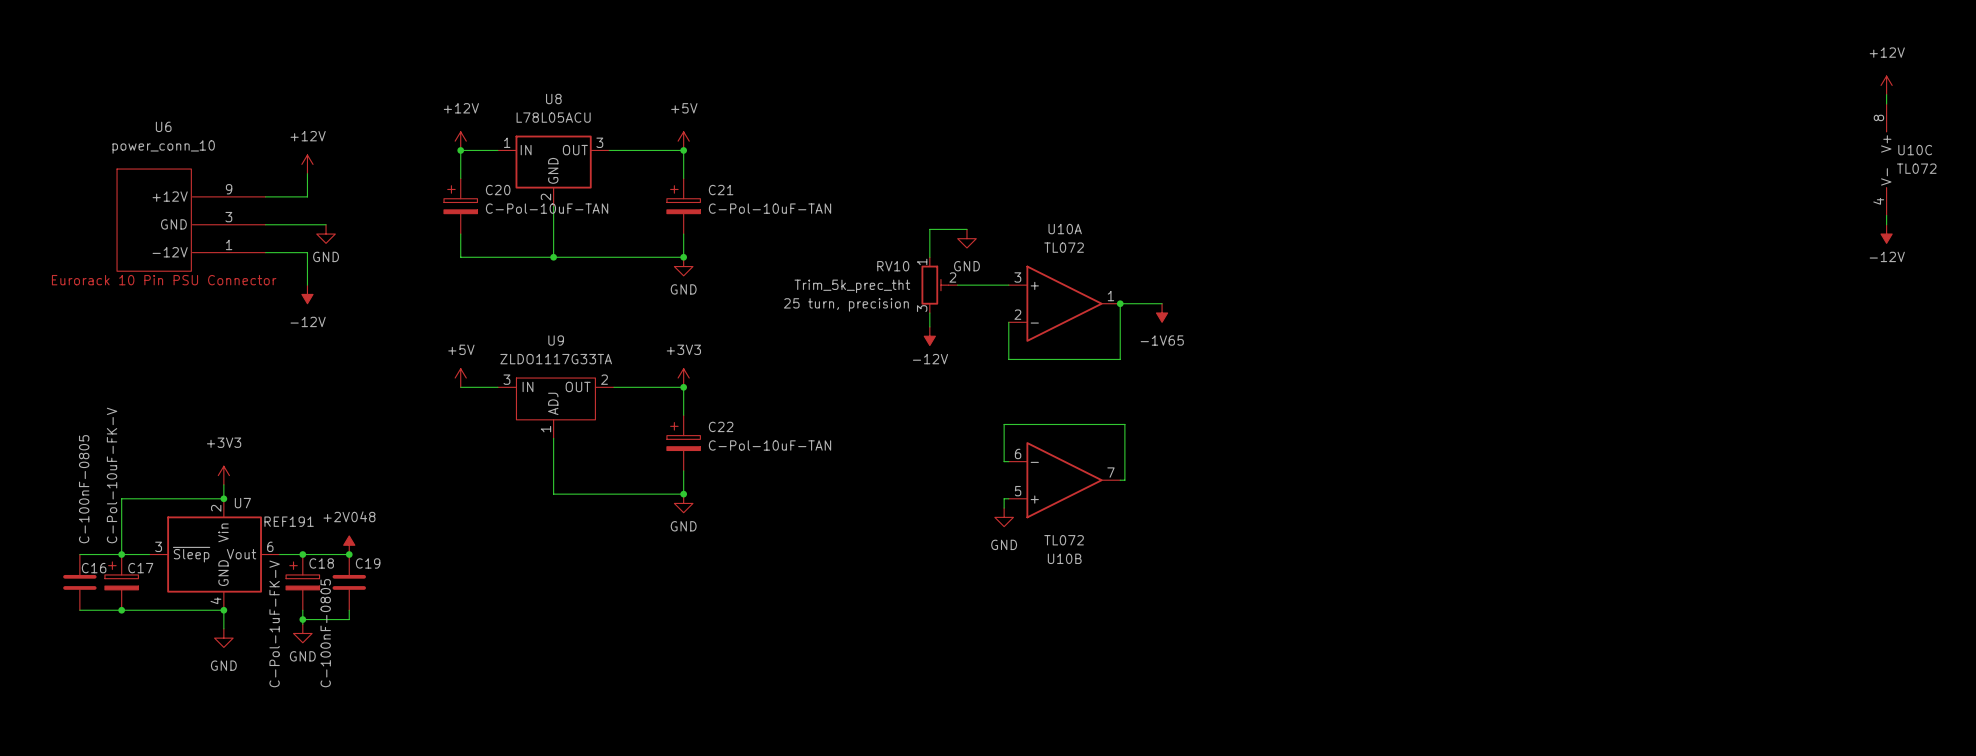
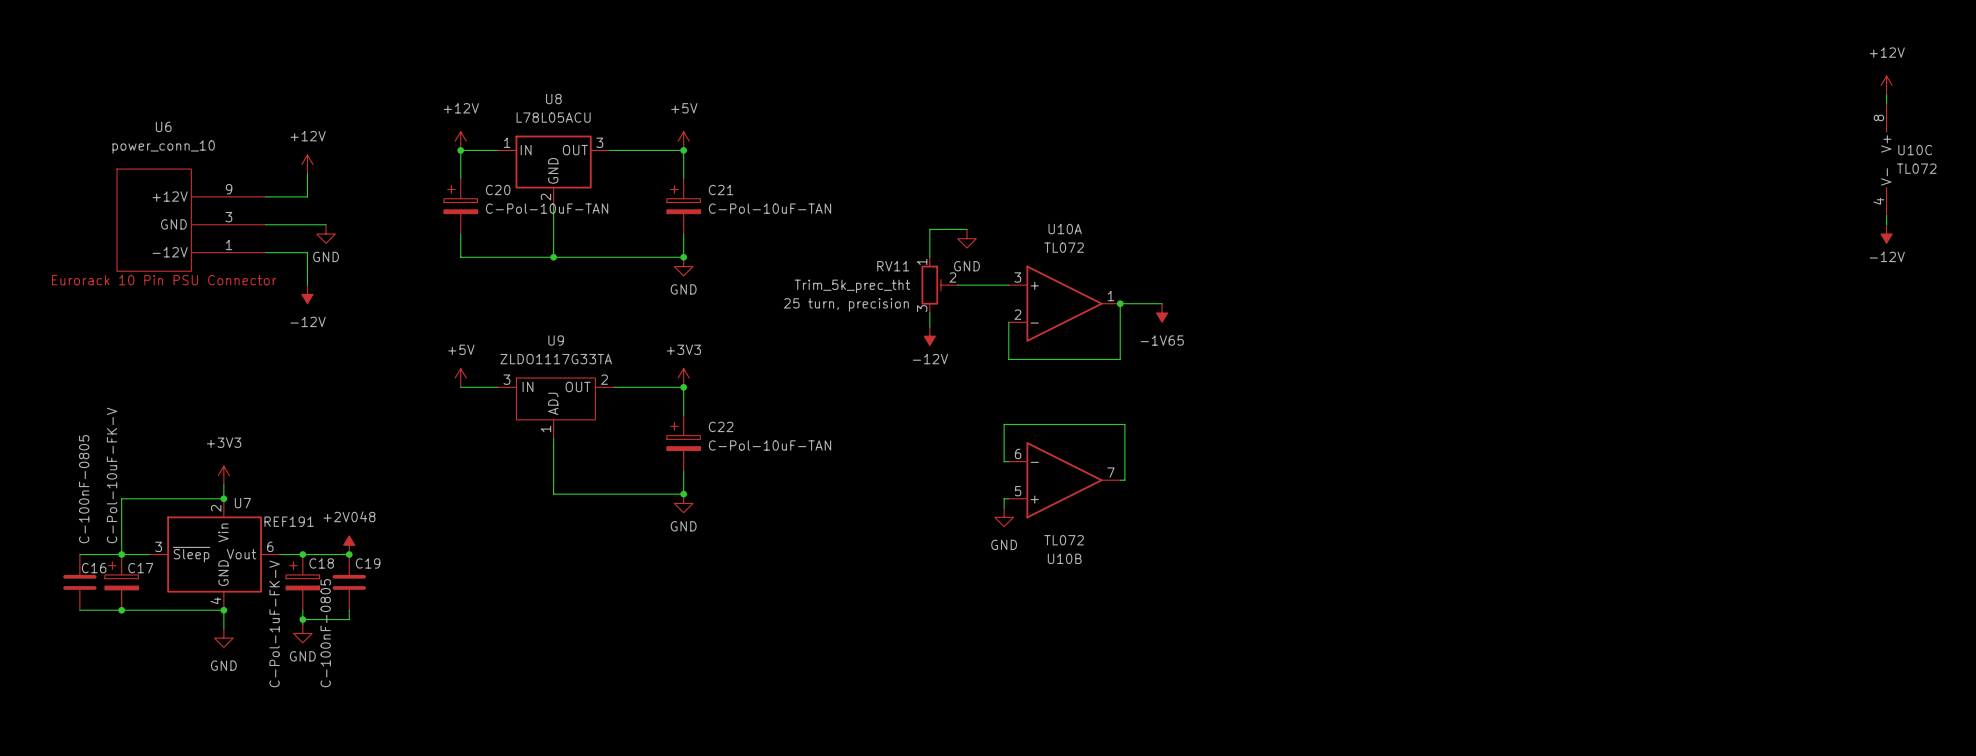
RV10 name: RV10 (893, 266) -> RV11 (893, 266)

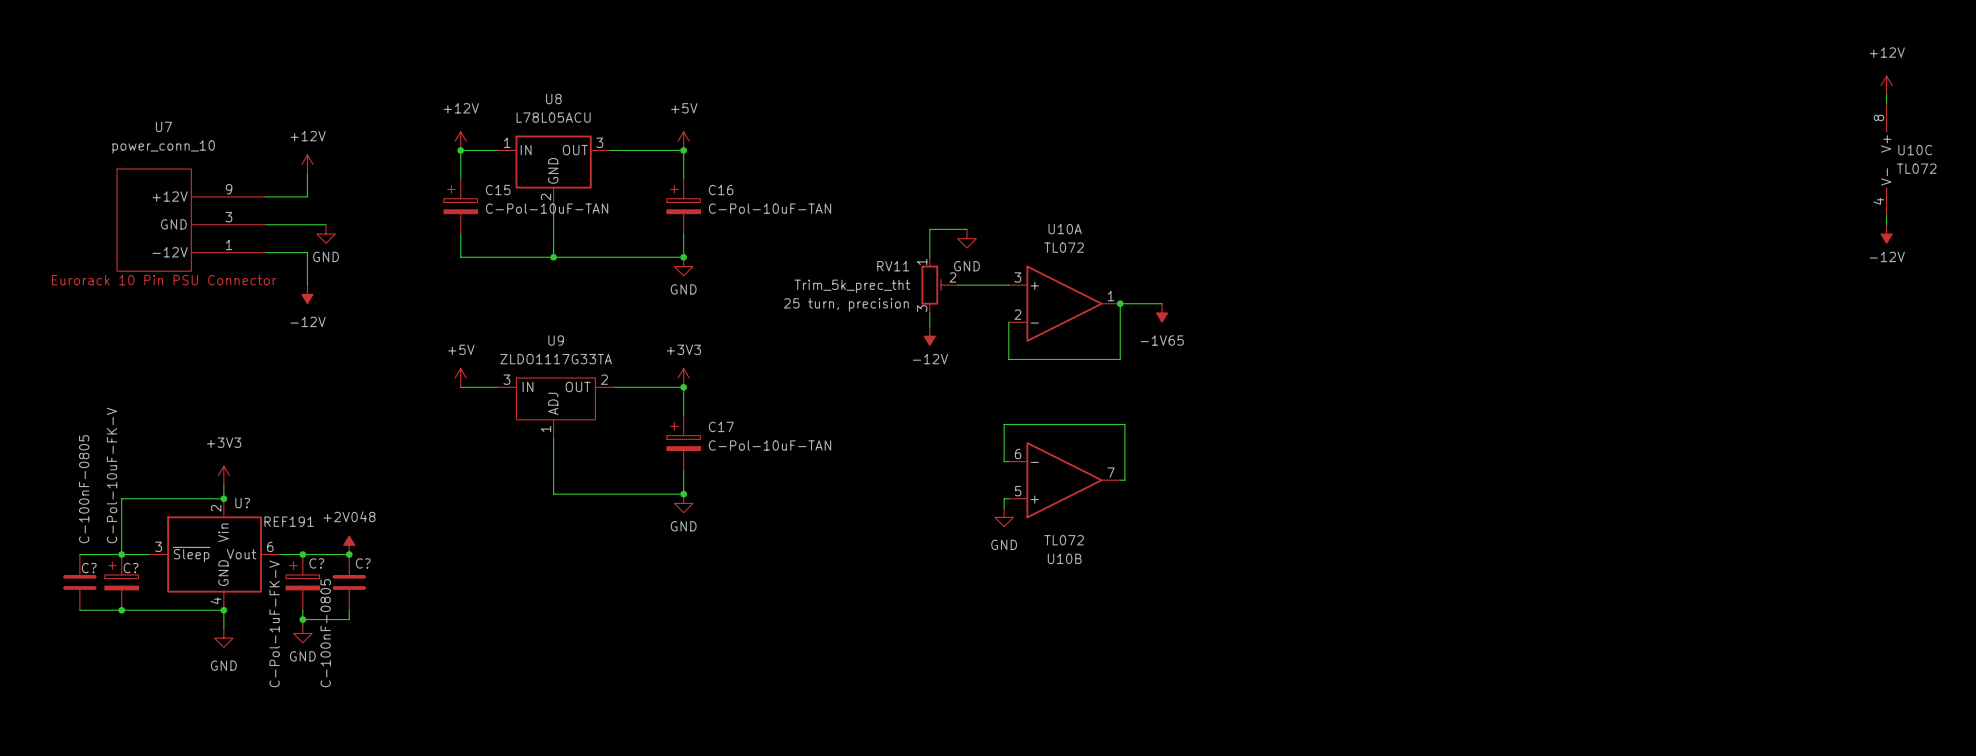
U6 name: U6 (163, 126) -> U7 (163, 126)
C20 name: C20 (498, 190) -> C15 (498, 190)
C21 name: C21 (721, 190) -> C16 (721, 190)
C22 name: C22 (721, 426) -> C17 (721, 426)
U7 name: U7 (242, 503) -> U? (242, 503)
C18 name: C18 (321, 563) -> C? (316, 563)
C19 name: C19 (368, 563) -> C? (363, 563)
C16 name: C16 (94, 568) -> C? (89, 568)
C17 name: C17 (140, 568) -> C? (131, 568)

